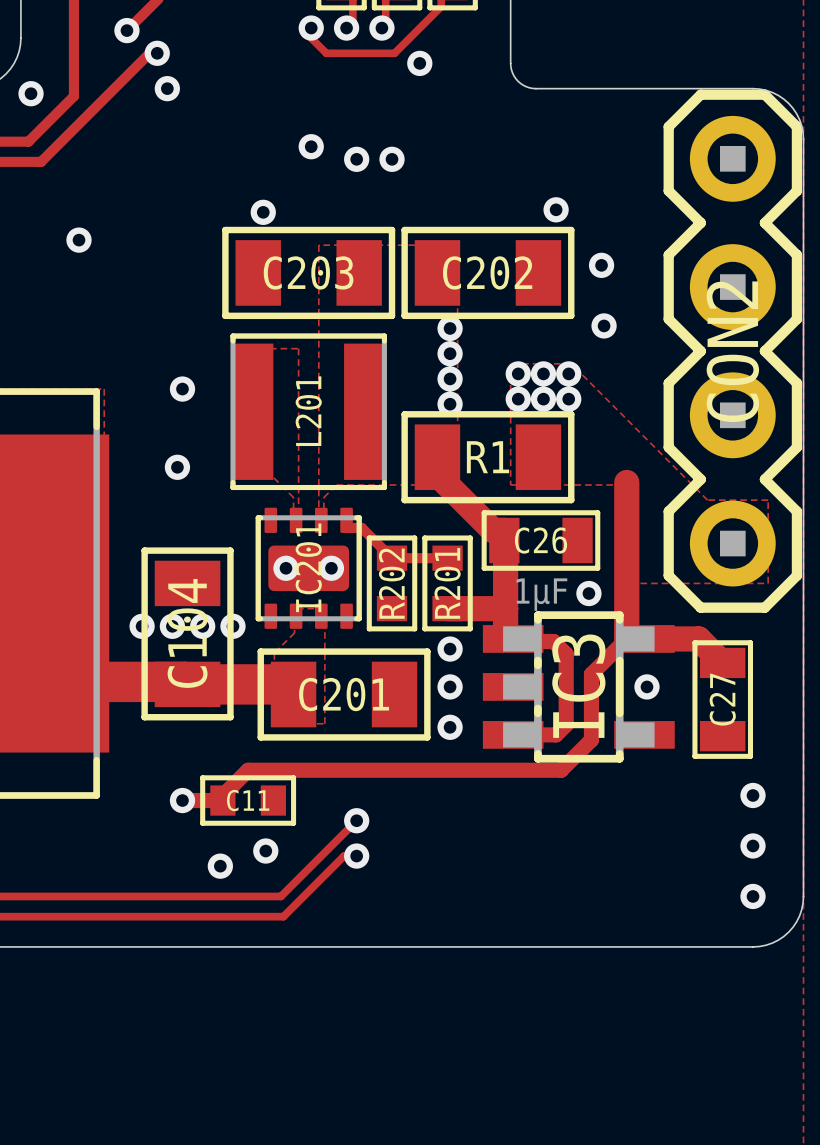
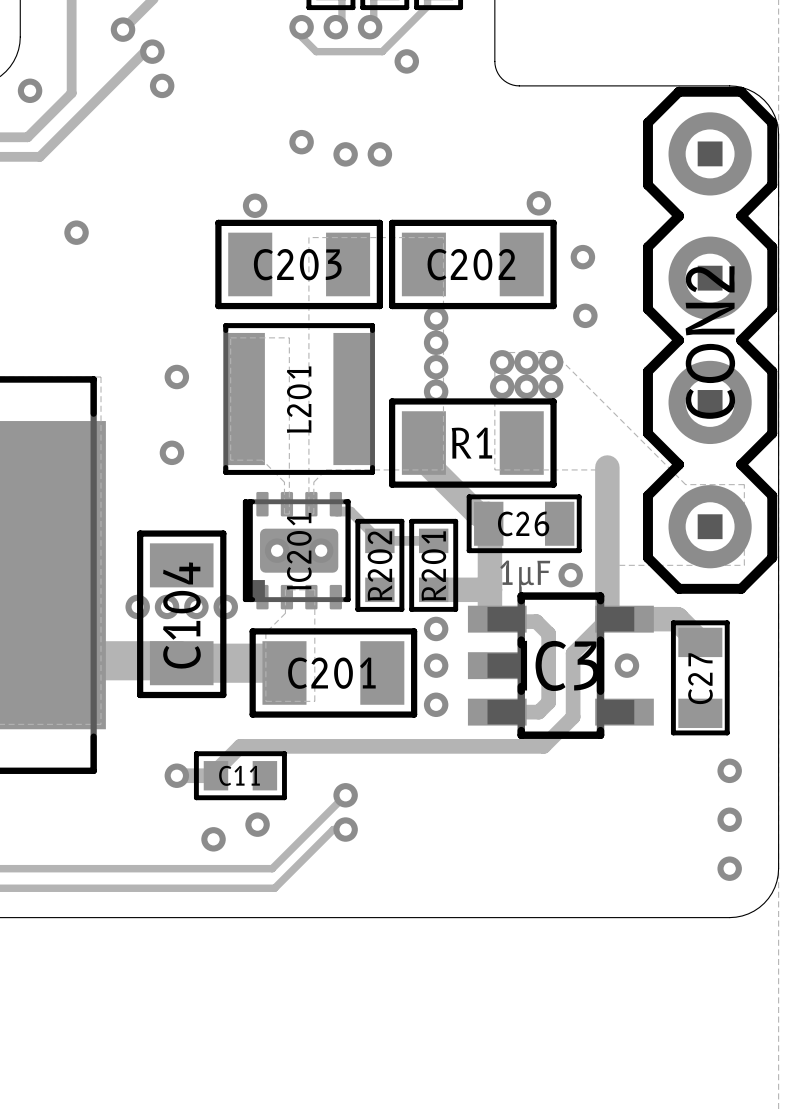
IC201 footprint: [255, 507, 362, 629] -> [242, 491, 351, 610]
IC3 name rotation: 0° (578, 686) -> 90° clockwise (559, 665)

